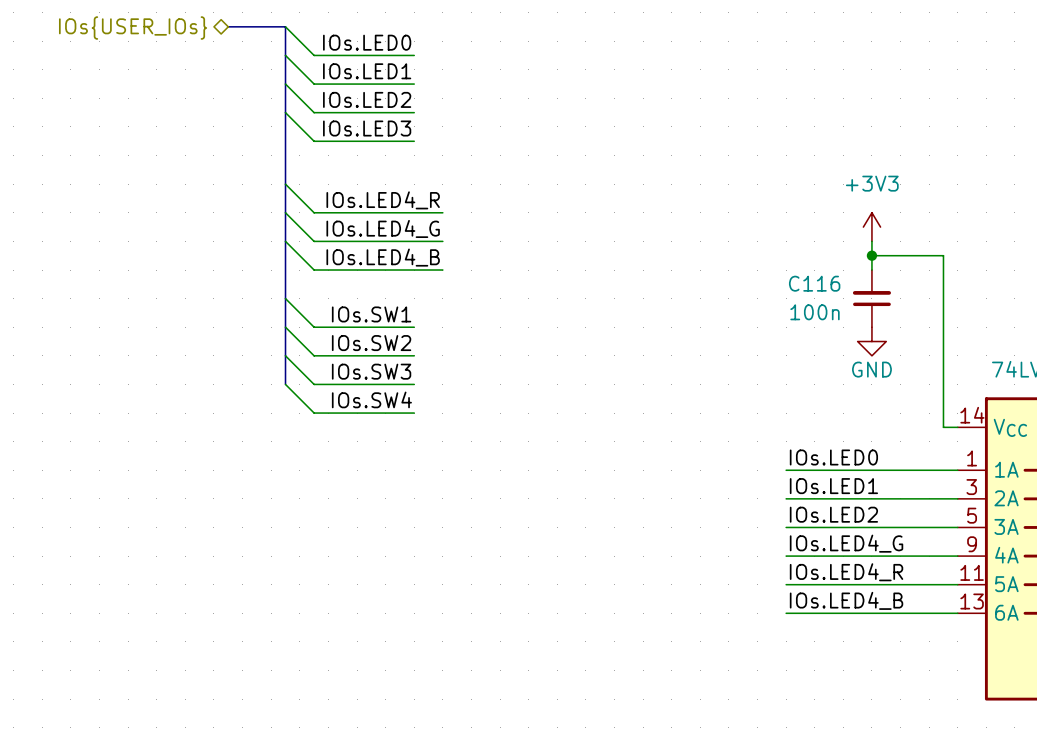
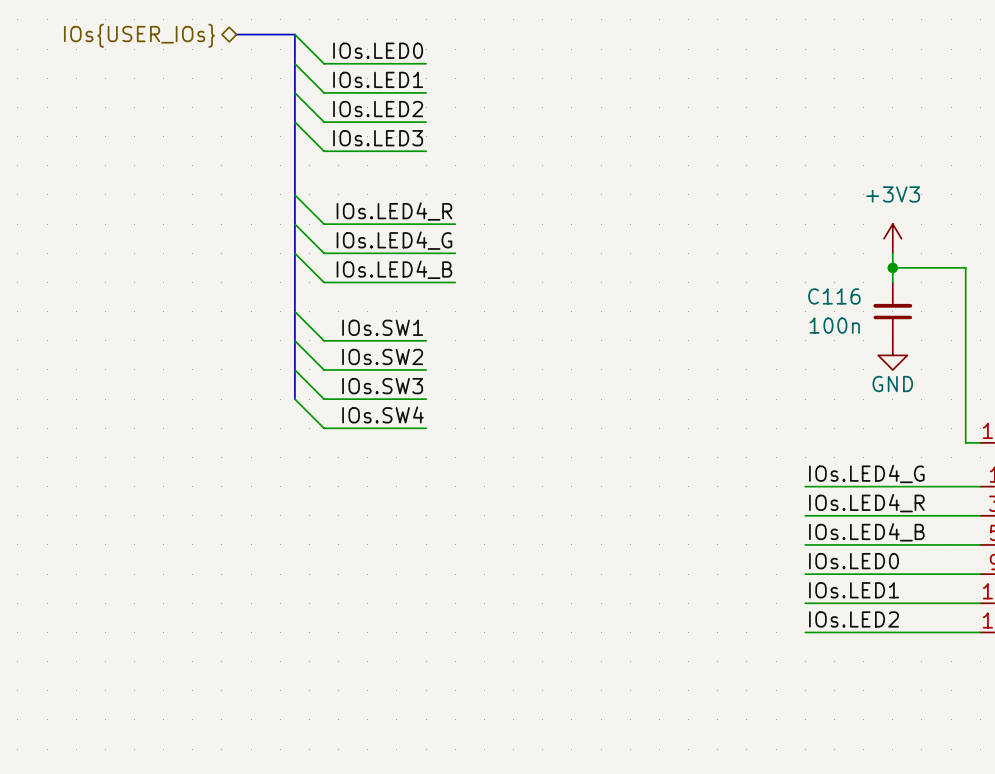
label: IOs.LED0 (833, 457) -> IOs.LED4_G (866, 473)
label: IOs.LED1 (833, 486) -> IOs.LED4_R (866, 503)
label: IOs.LED2 (833, 514) -> IOs.LED4_B (866, 532)
label: IOs.LED4_G (846, 543) -> IOs.LED0 (854, 561)
label: IOs.LED4_R (846, 572) -> IOs.LED1 (854, 590)
label: IOs.LED4_B (846, 600) -> IOs.LED2 (854, 619)

